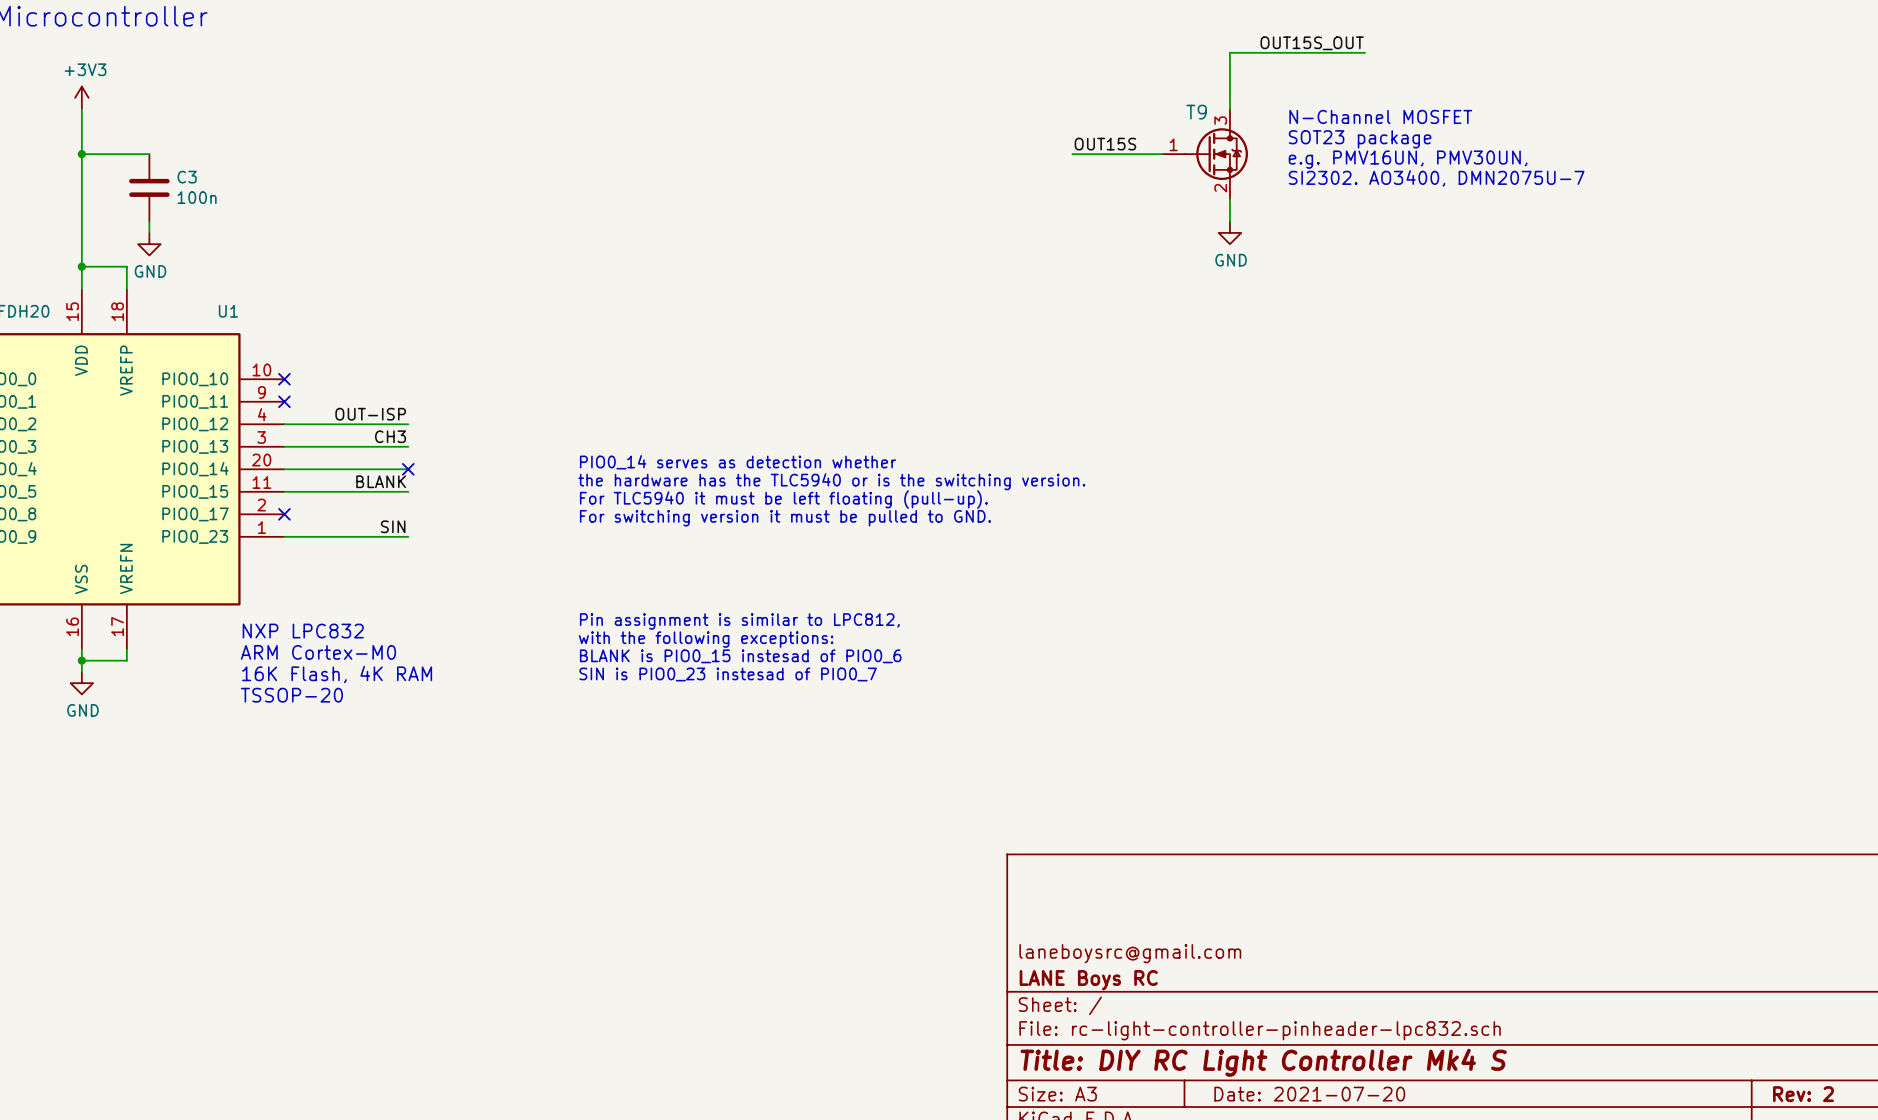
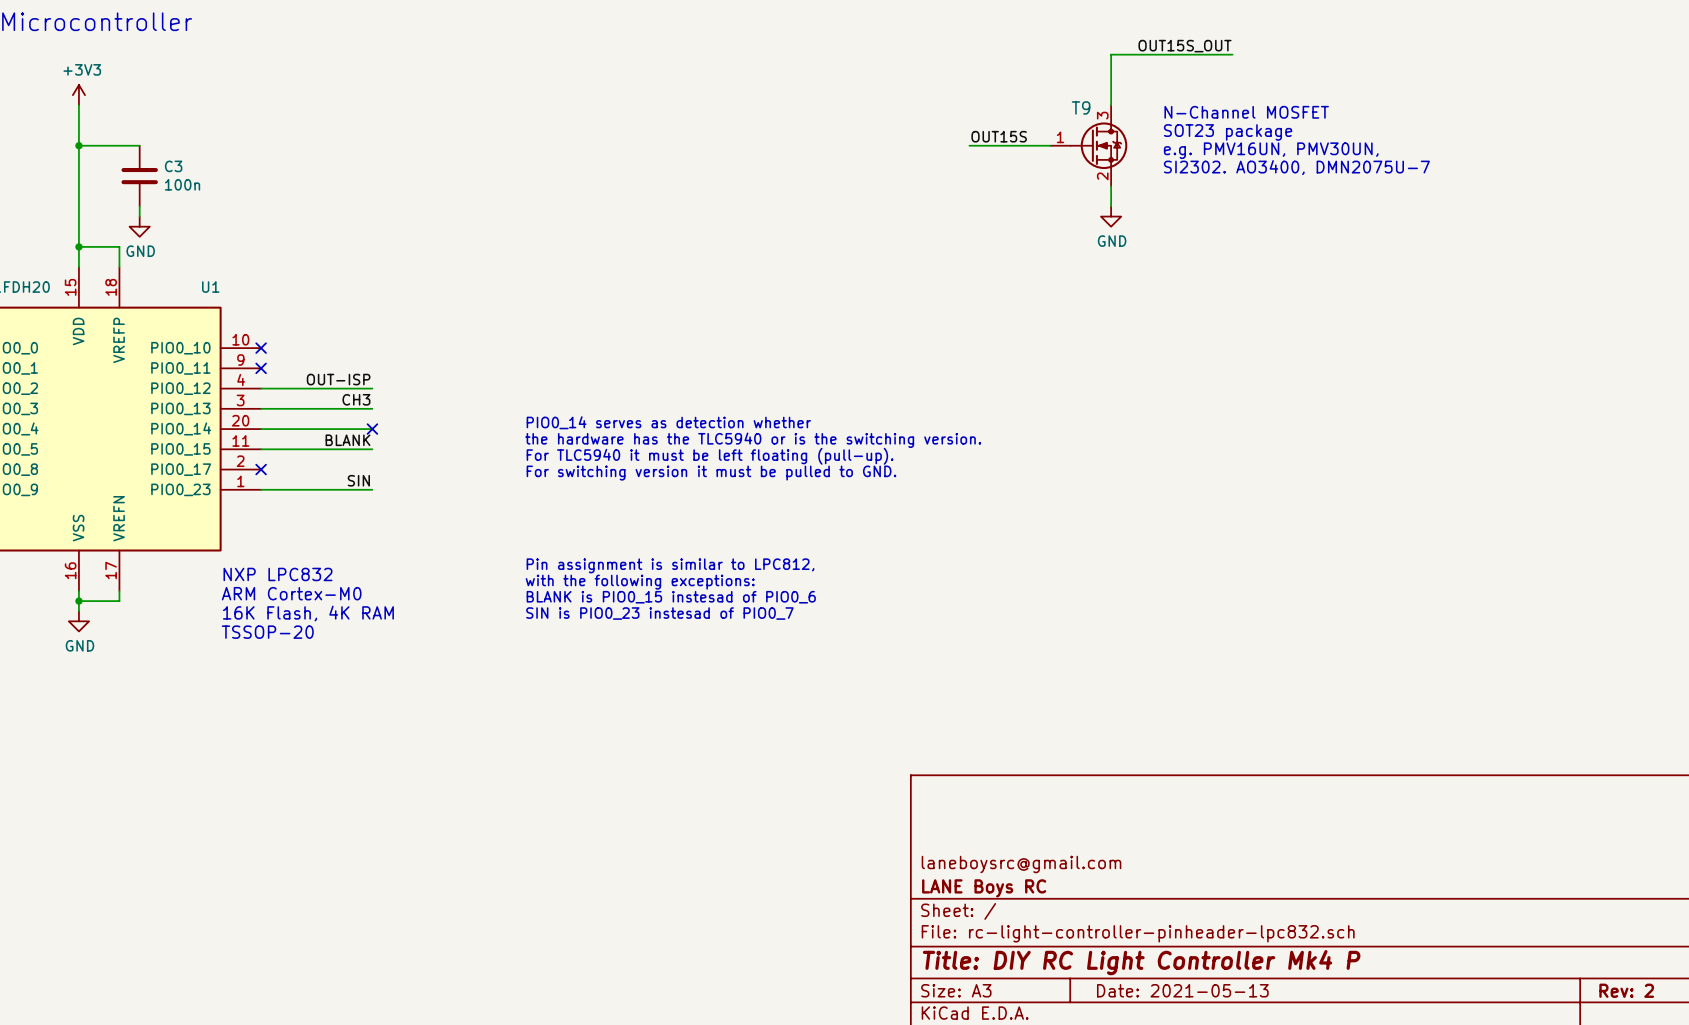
title block: Title: DIY RC Light Controller Mk4 S (1263, 1062) -> Title: DIY RC Light Controller Mk4 P (1141, 962)
title block: Date: 2021-07-20 (1309, 1094) -> Date: 2021-05-13 (1182, 990)

